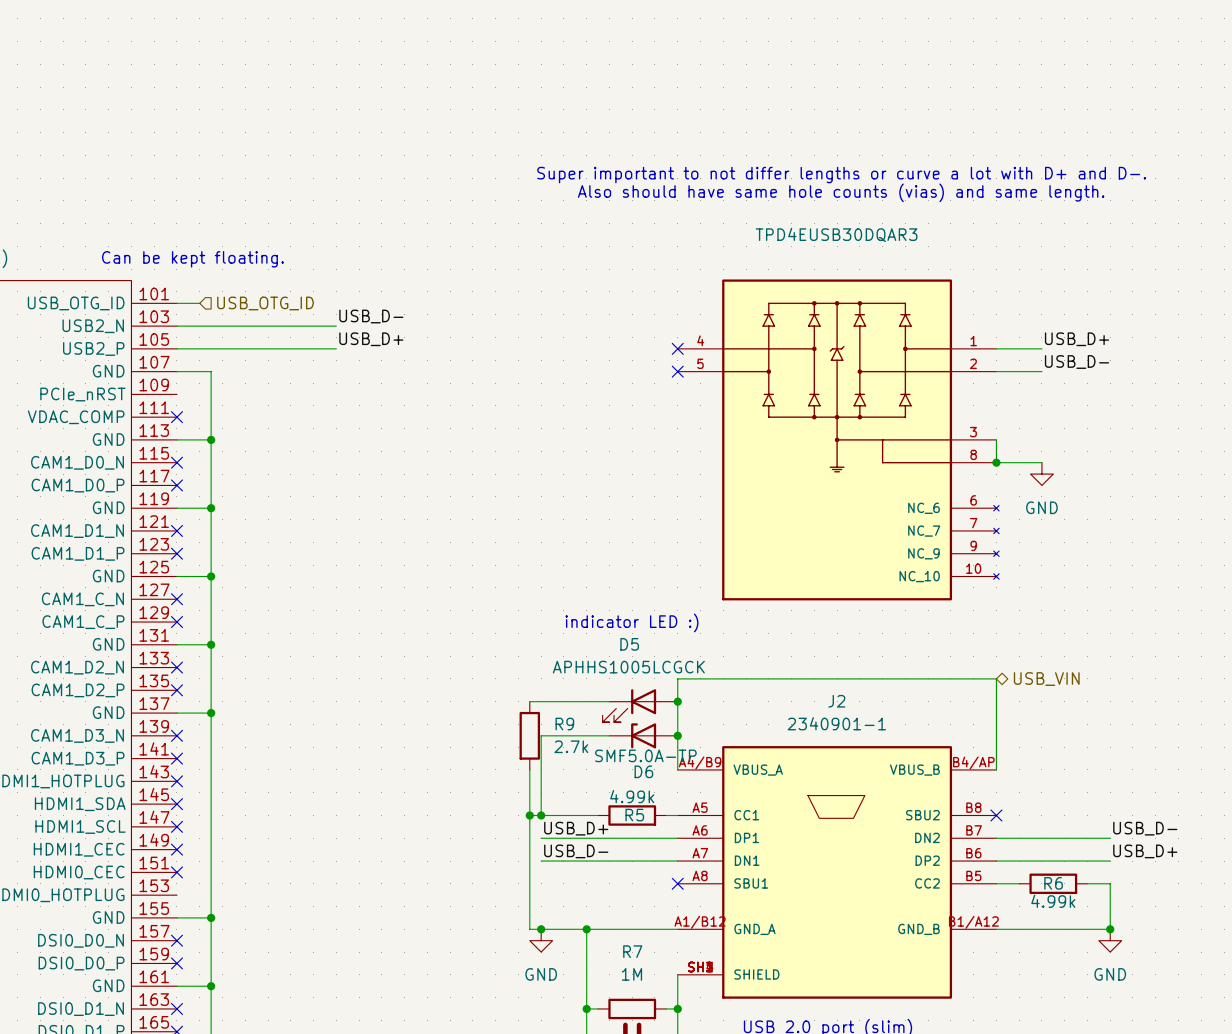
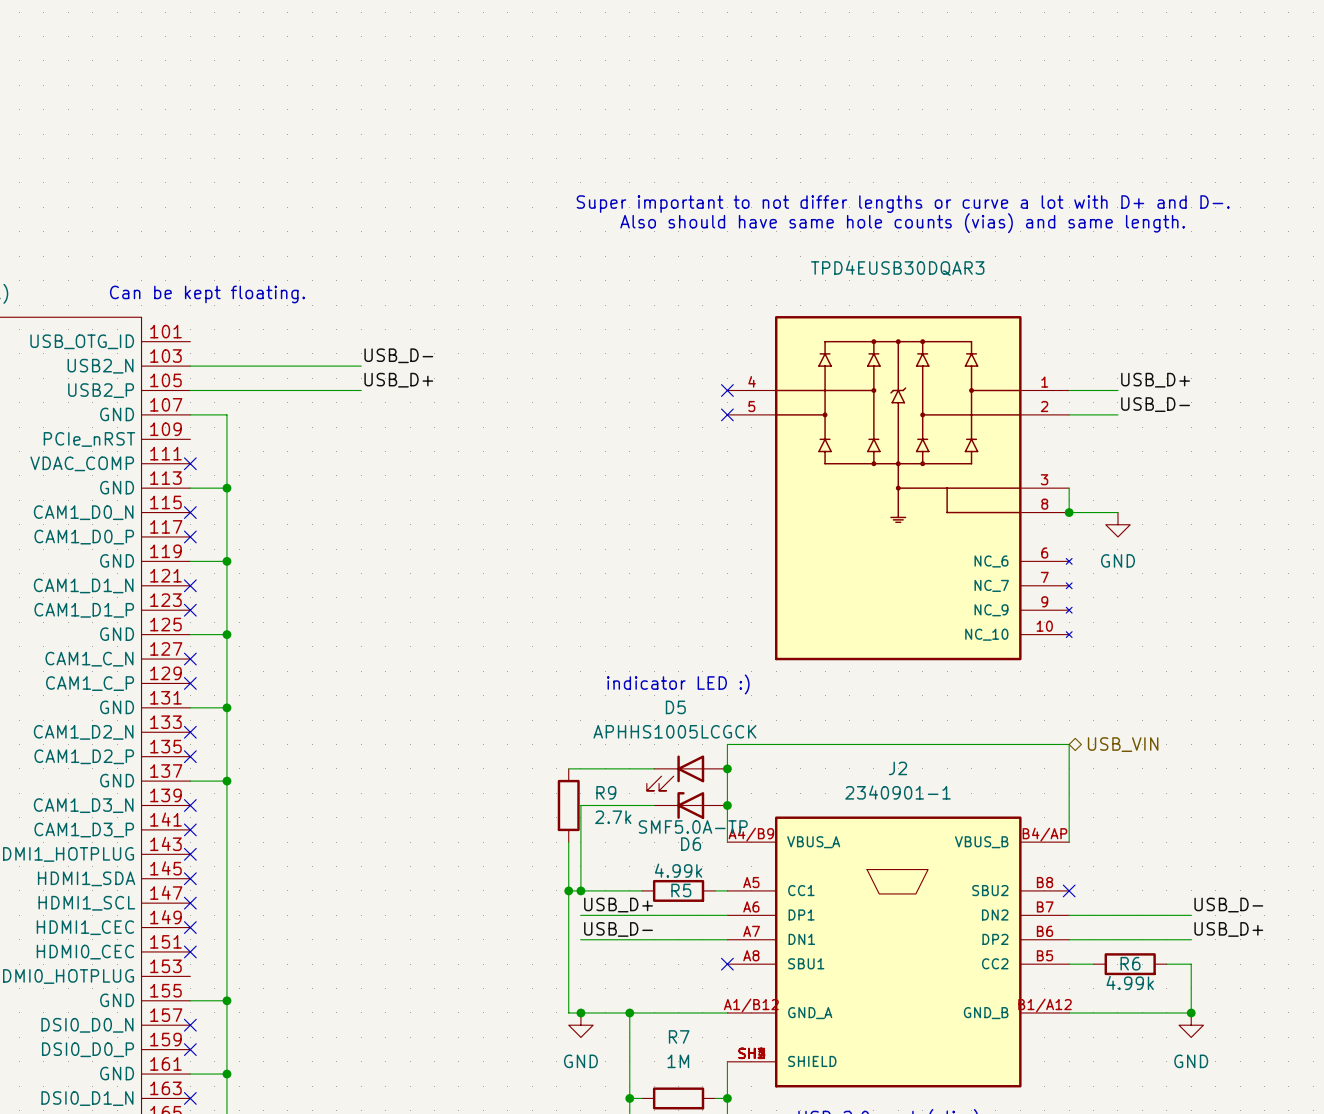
wire: (176, 303) (199, 303) -> none
hierarchical label: USB_OTG_ID (265, 303) -> none

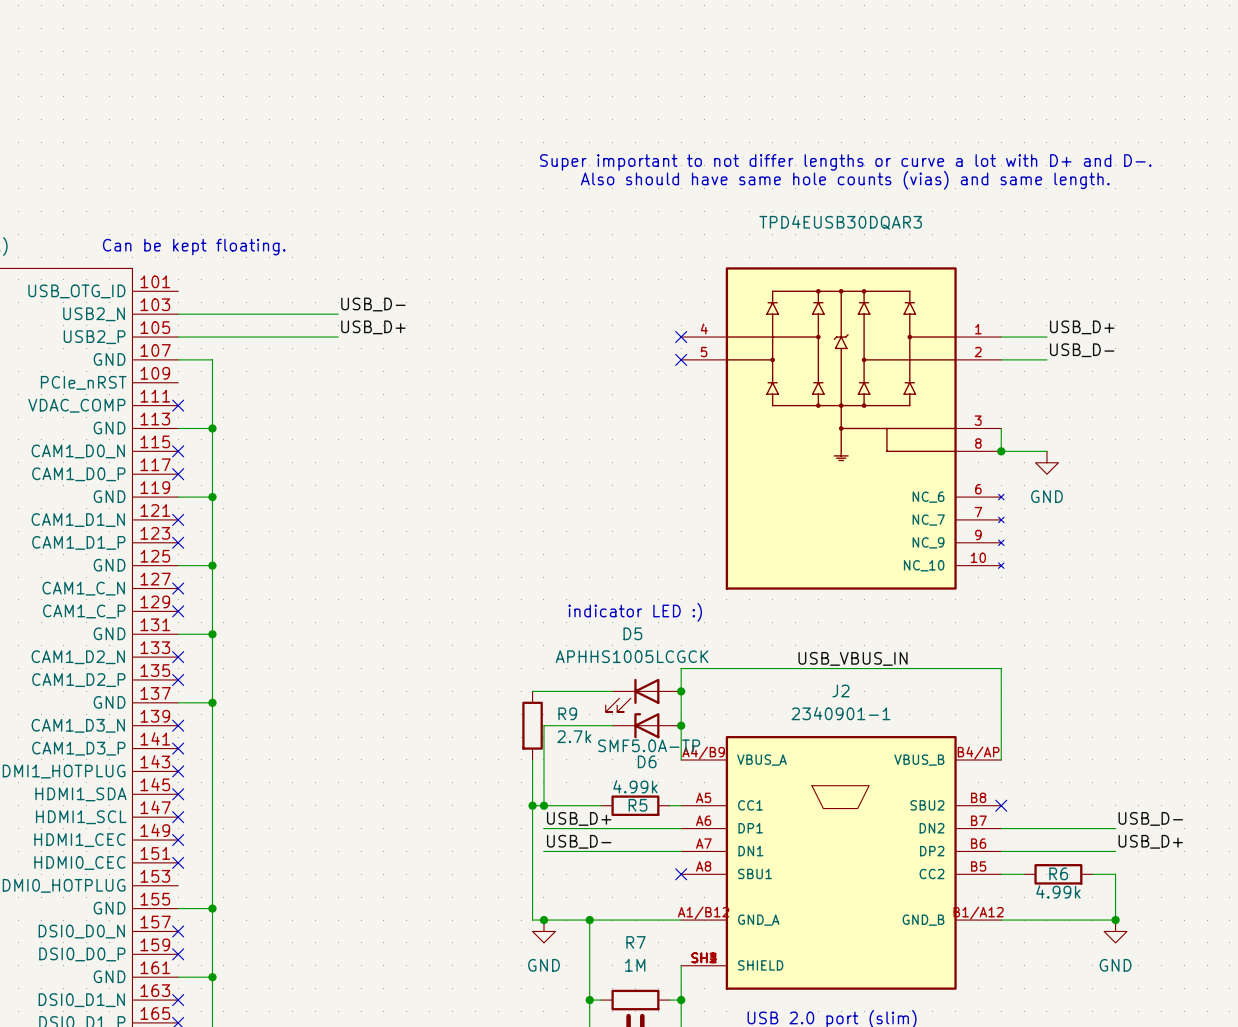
label: none -> USB_VBUS_IN (853, 658)
hierarchical label: USB_VIN (1123, 744) -> none

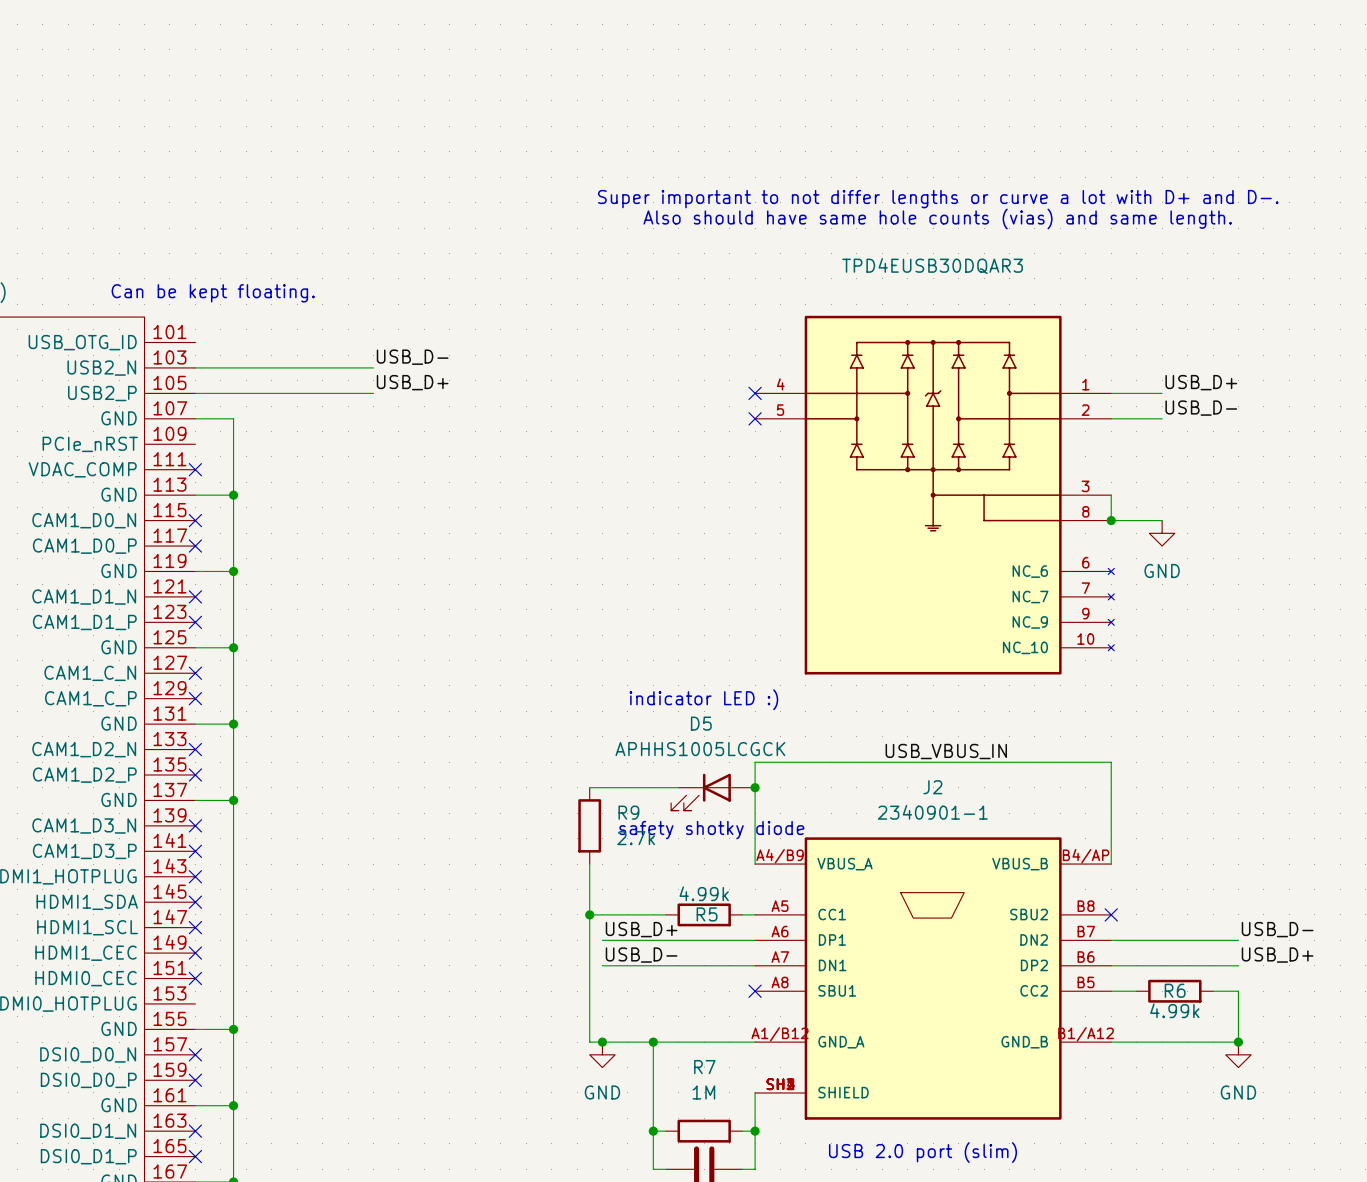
wire: (612, 725) (543, 725) (543, 805) -> none
D6: SMF5.0A-TP (646, 725) -> none
junction: (681, 725) -> none
text: none -> safety shotky diode (711, 830)
junction: (543, 805) -> none

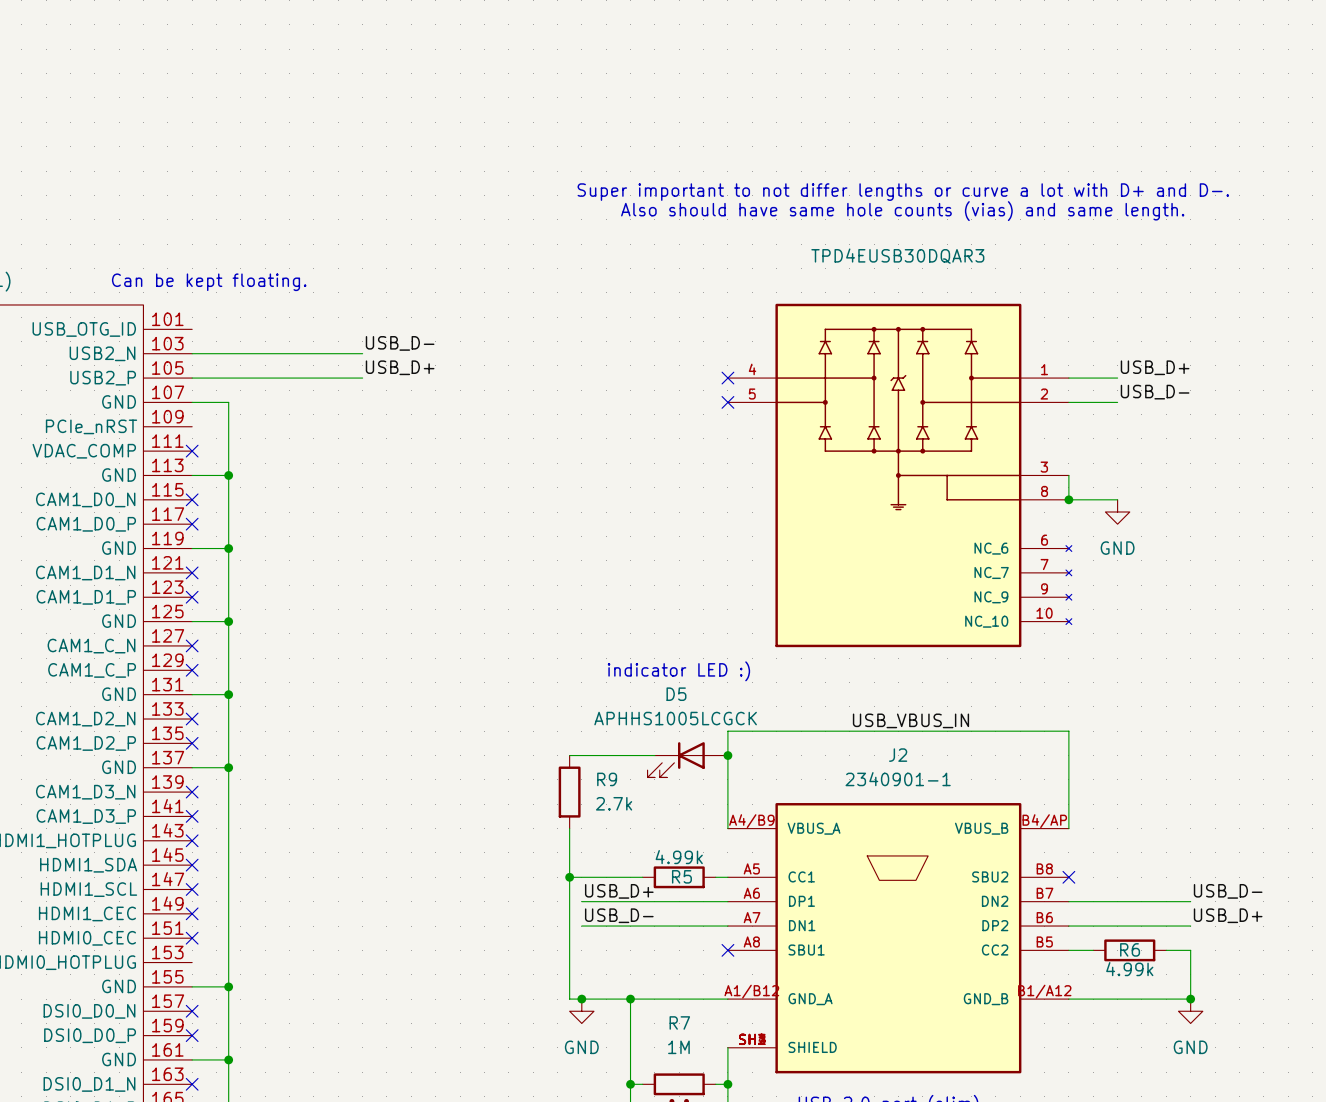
text: safety shotky diode (711, 830) -> none

